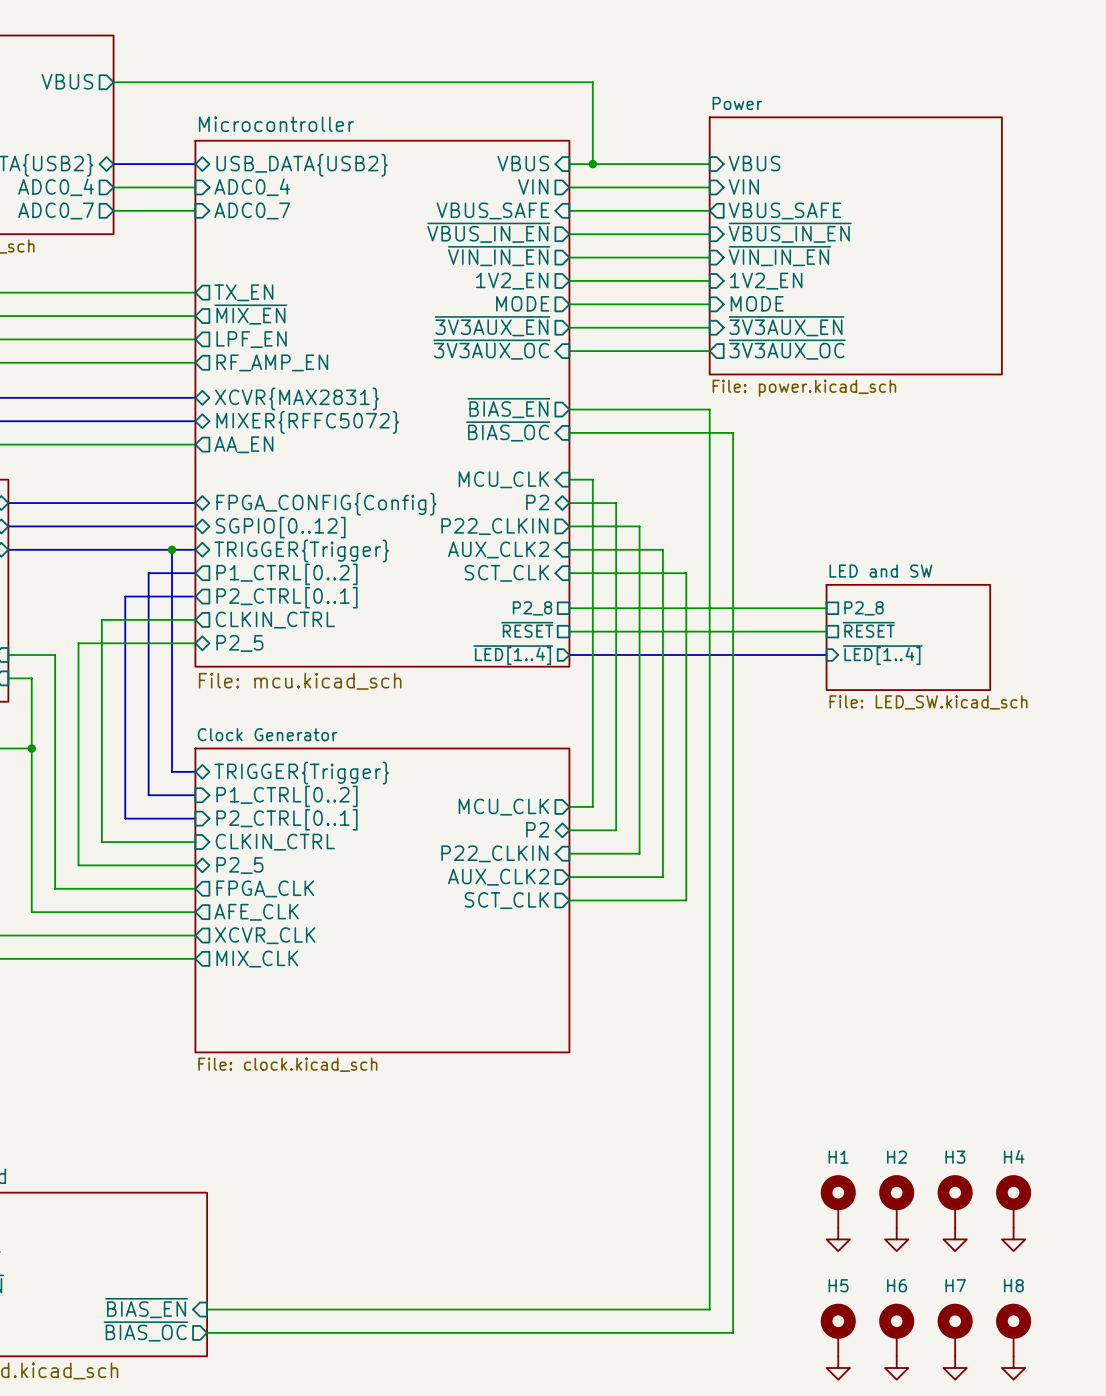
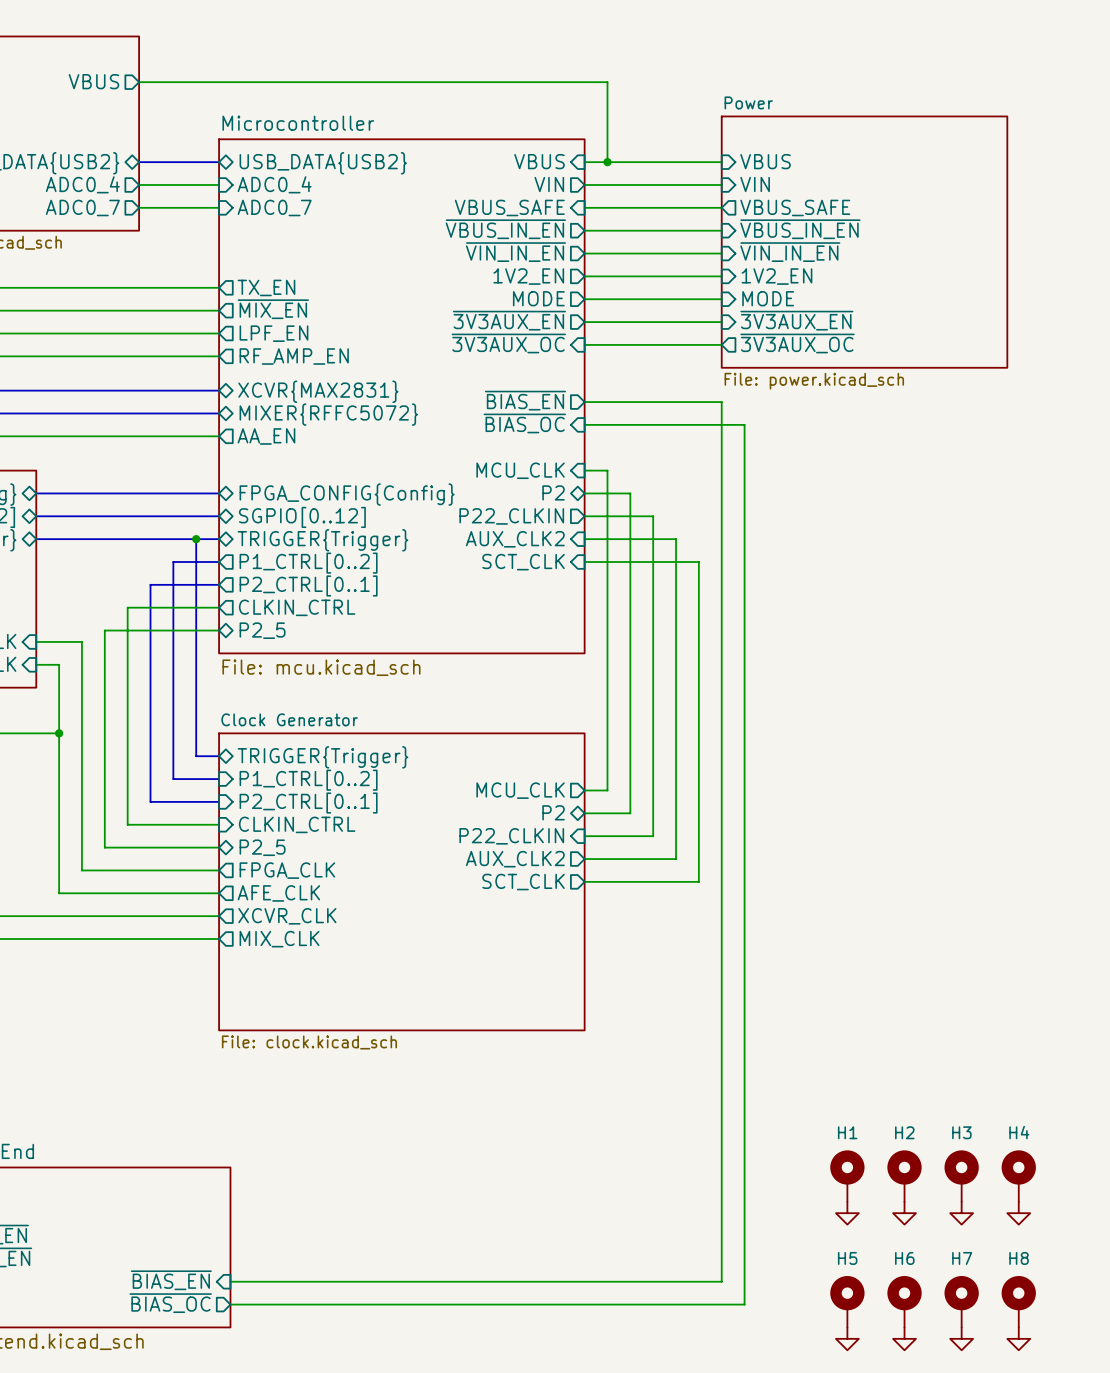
sheet pin: P2_8 (532, 608) -> none
wire: (569, 608) (826, 608) -> none
sheet pin: P2_8 (864, 608) -> none
sheet pin: ~{RESET} (527, 629) -> none
sheet pin: ~{RESET} (868, 629) -> none
wire: (569, 631) (826, 631) -> none
sheet LED and SW: File: LED_SW.kicad_sch (908, 637) -> none
bus: (569, 654) (826, 654) -> none
sheet pin: ~{LED[1..4]} (513, 655) -> none
sheet pin: ~{LED[1..4]} (882, 655) -> none

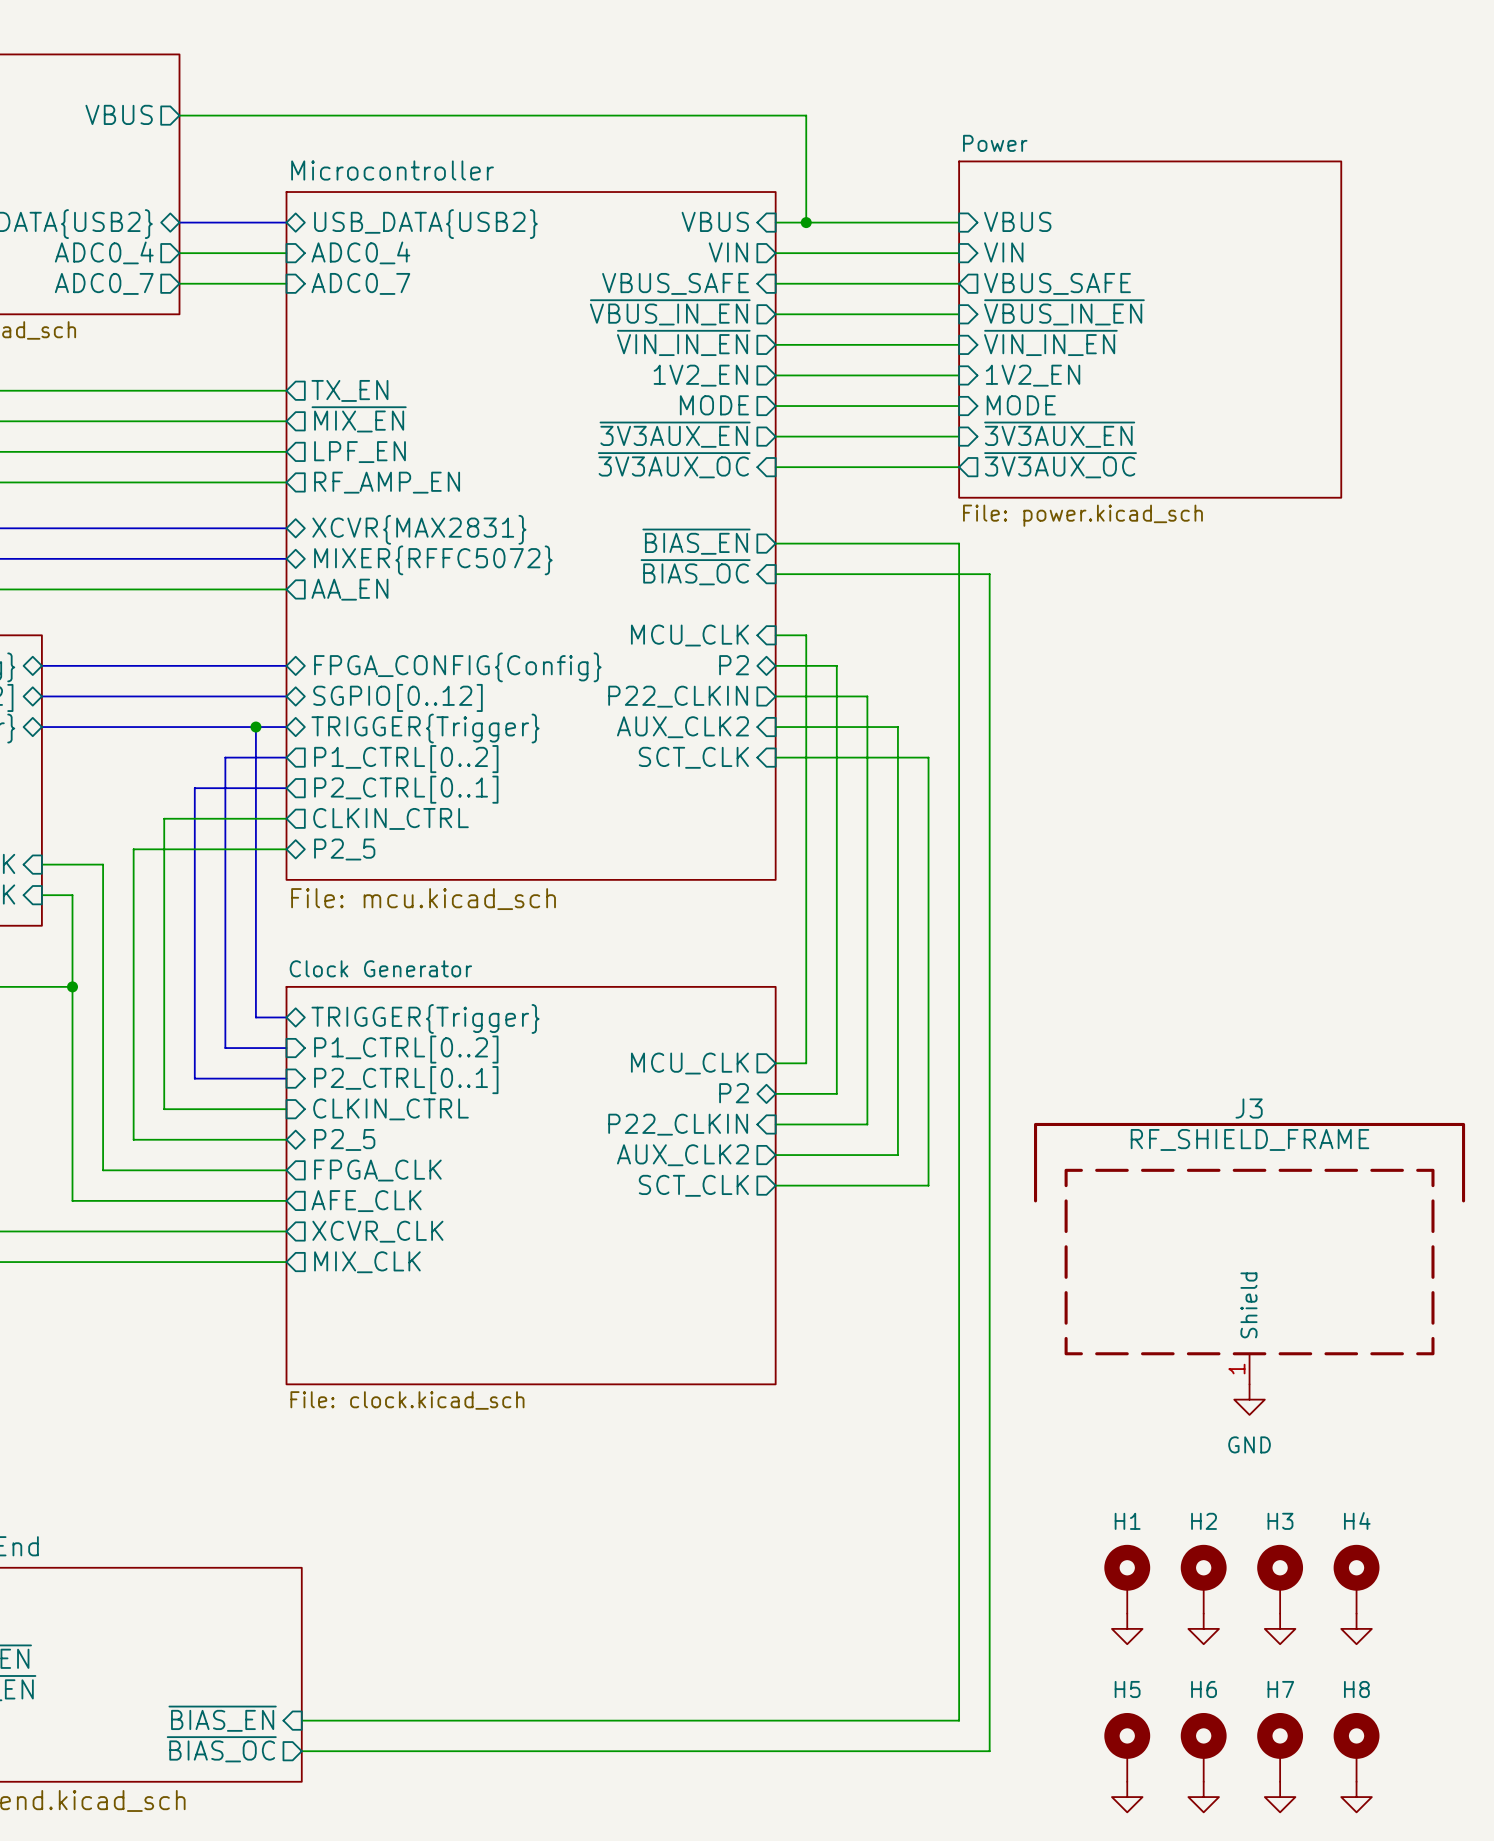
J3: none -> RF_SHIELD_FRAME (1249, 1253)
power symbol: none -> GND (1249, 1399)

